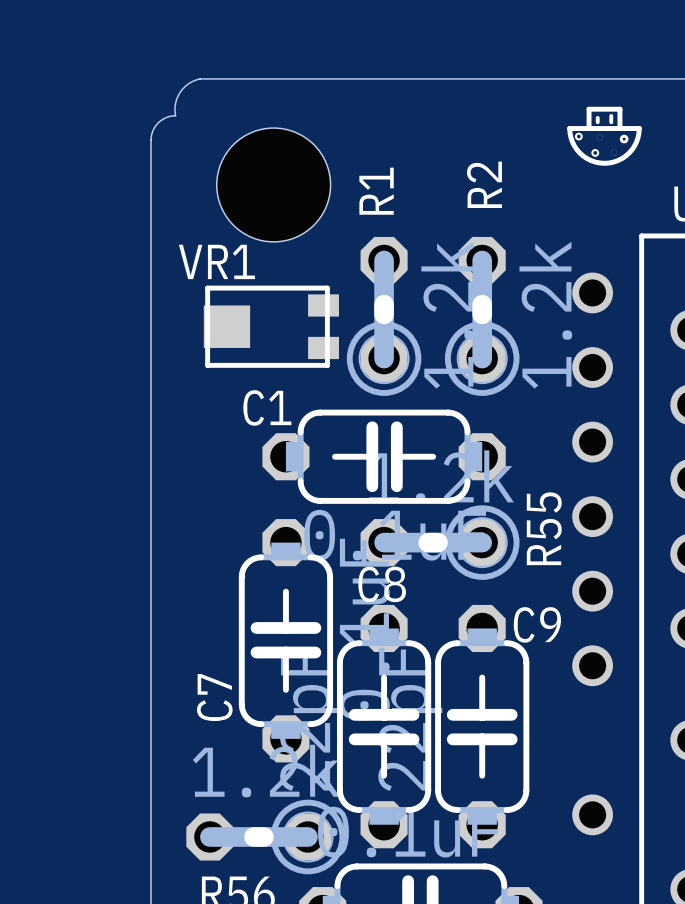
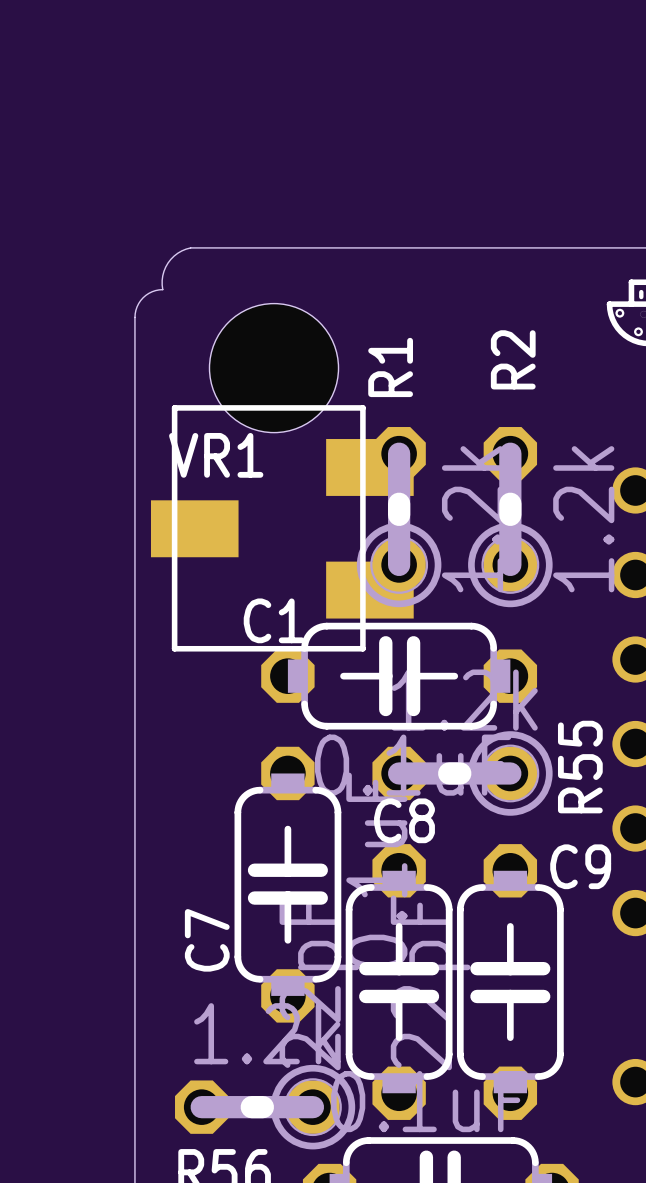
VR1 footprint: [203, 285, 339, 368] -> [150, 405, 414, 652]

